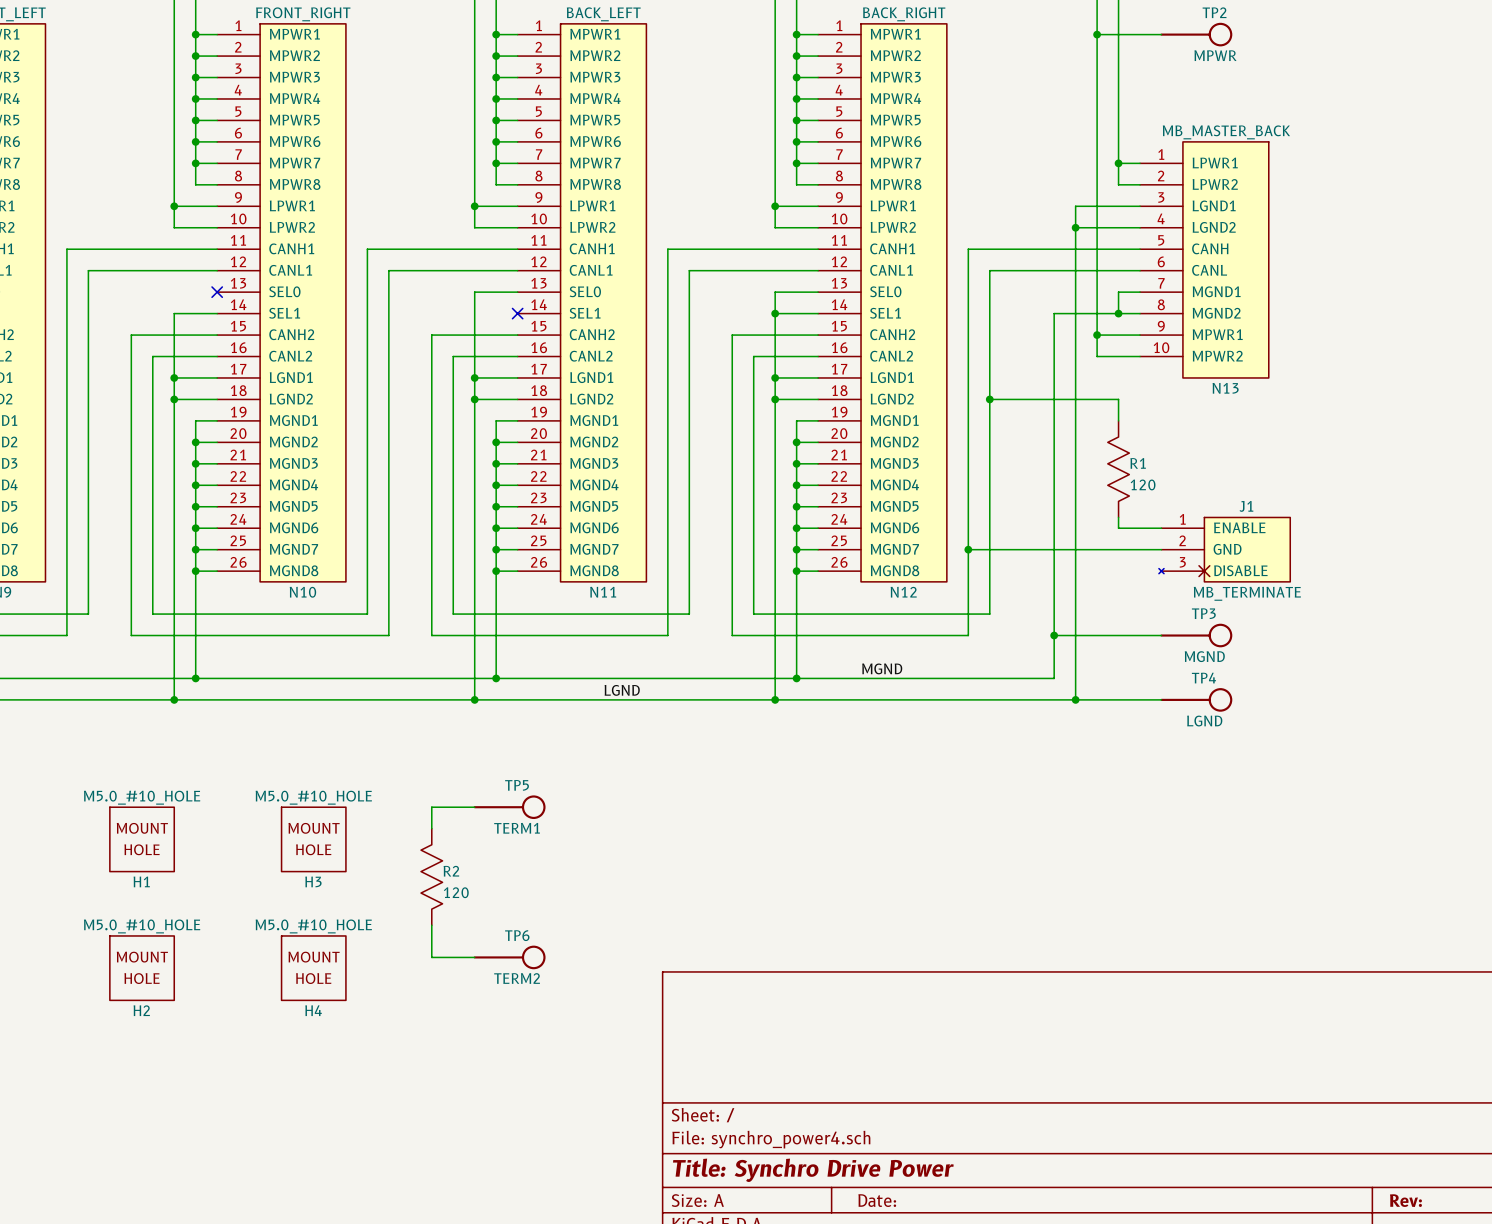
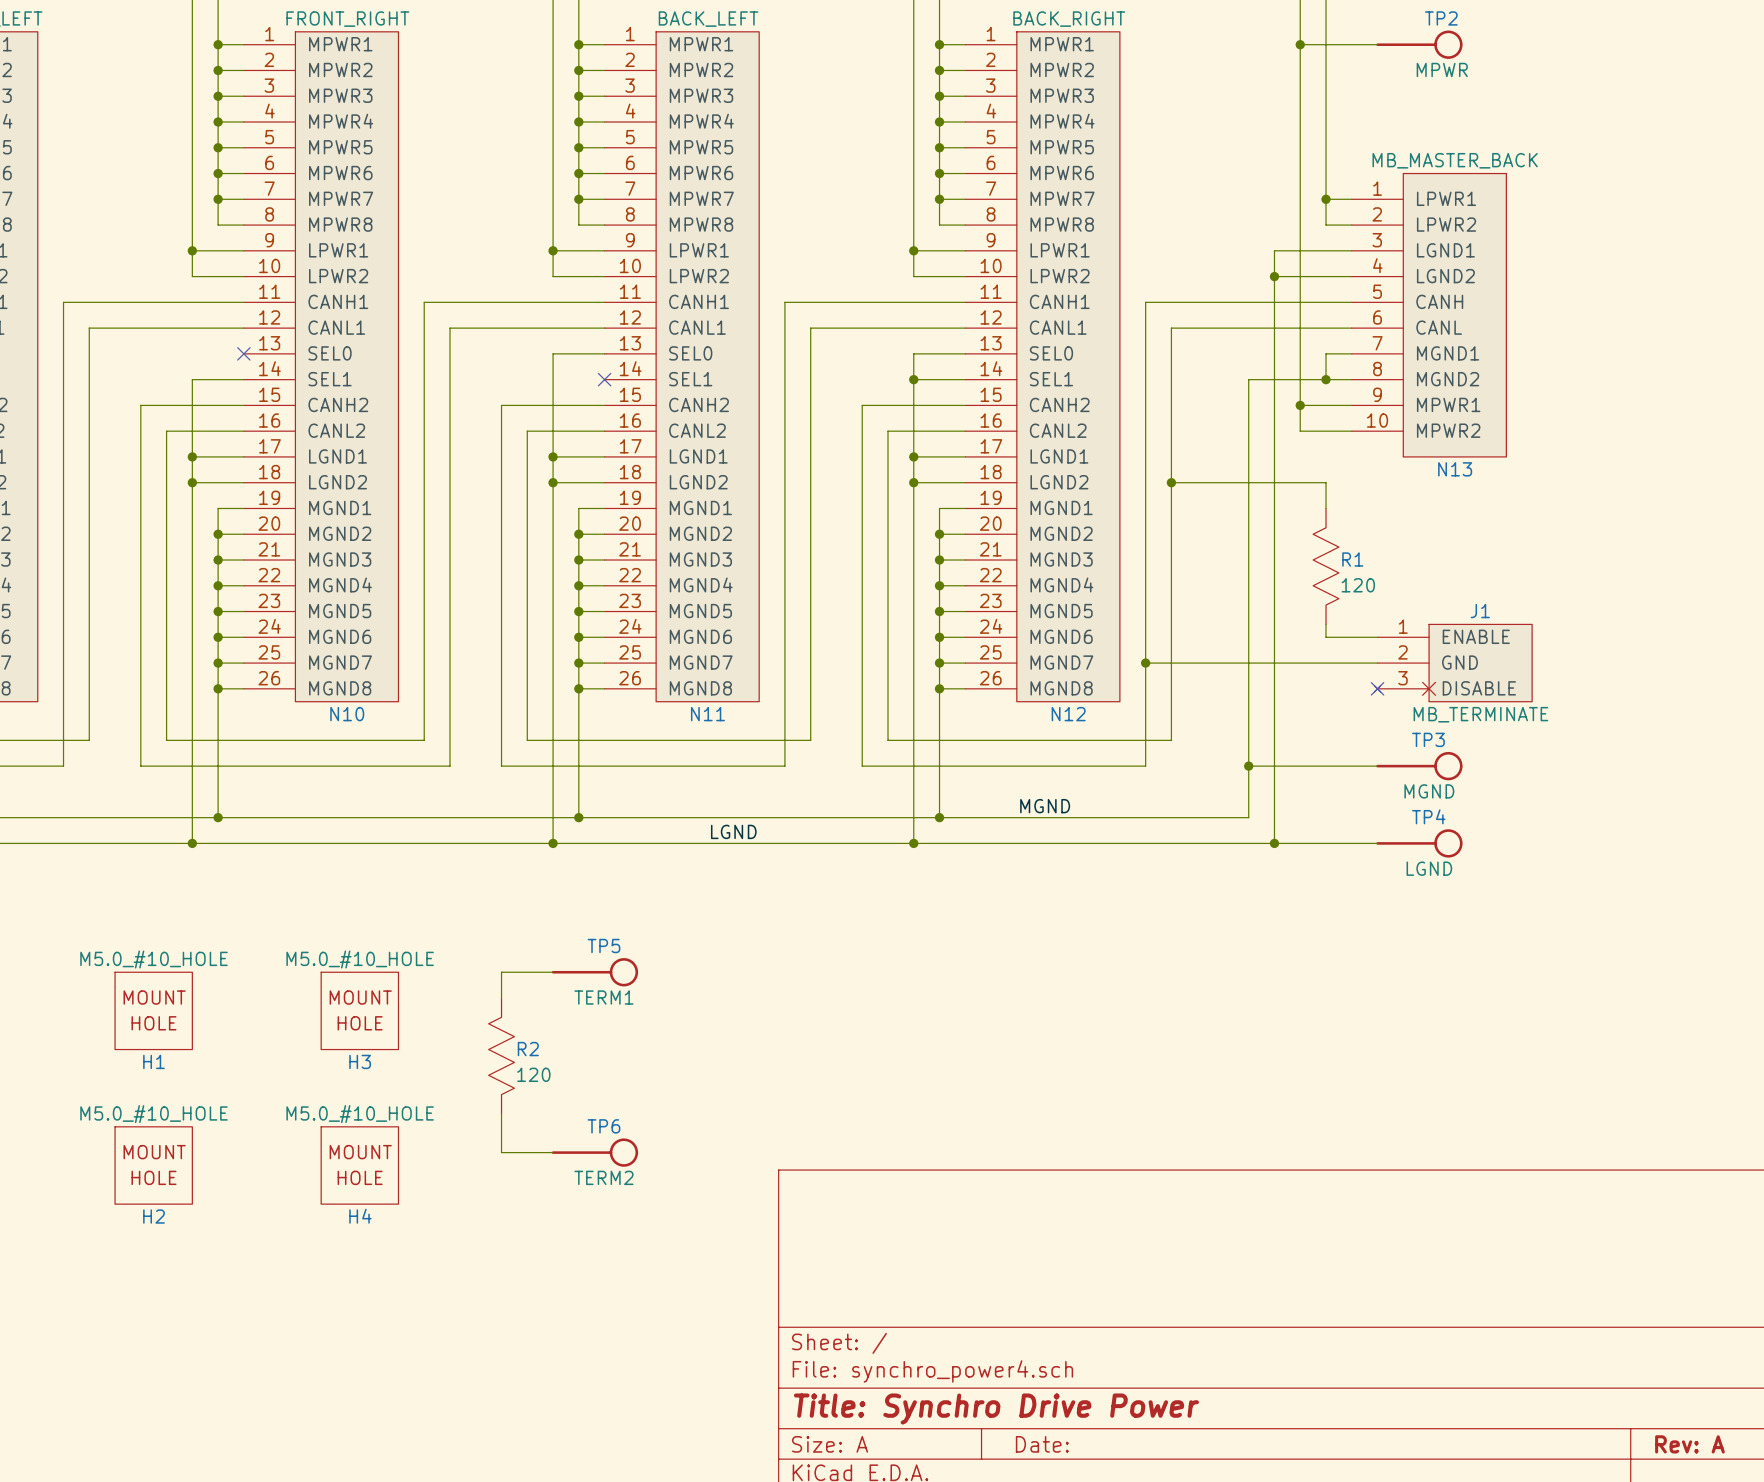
no-connect mark: none -> (1377, 688)
title block: Rev: (1405, 1200) -> Rev: A (1689, 1444)

